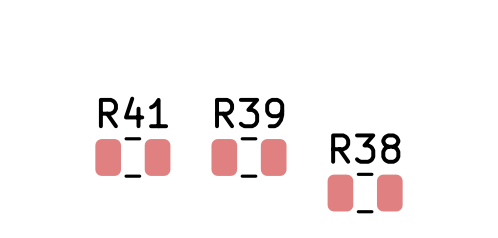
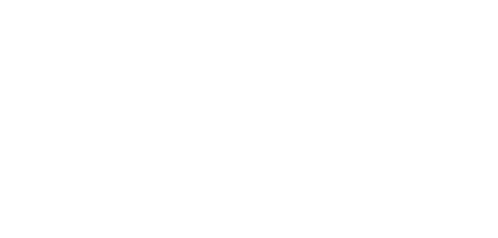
R41: (132, 157) -> none
R39: (248, 157) -> none
R38: (365, 193) -> none

